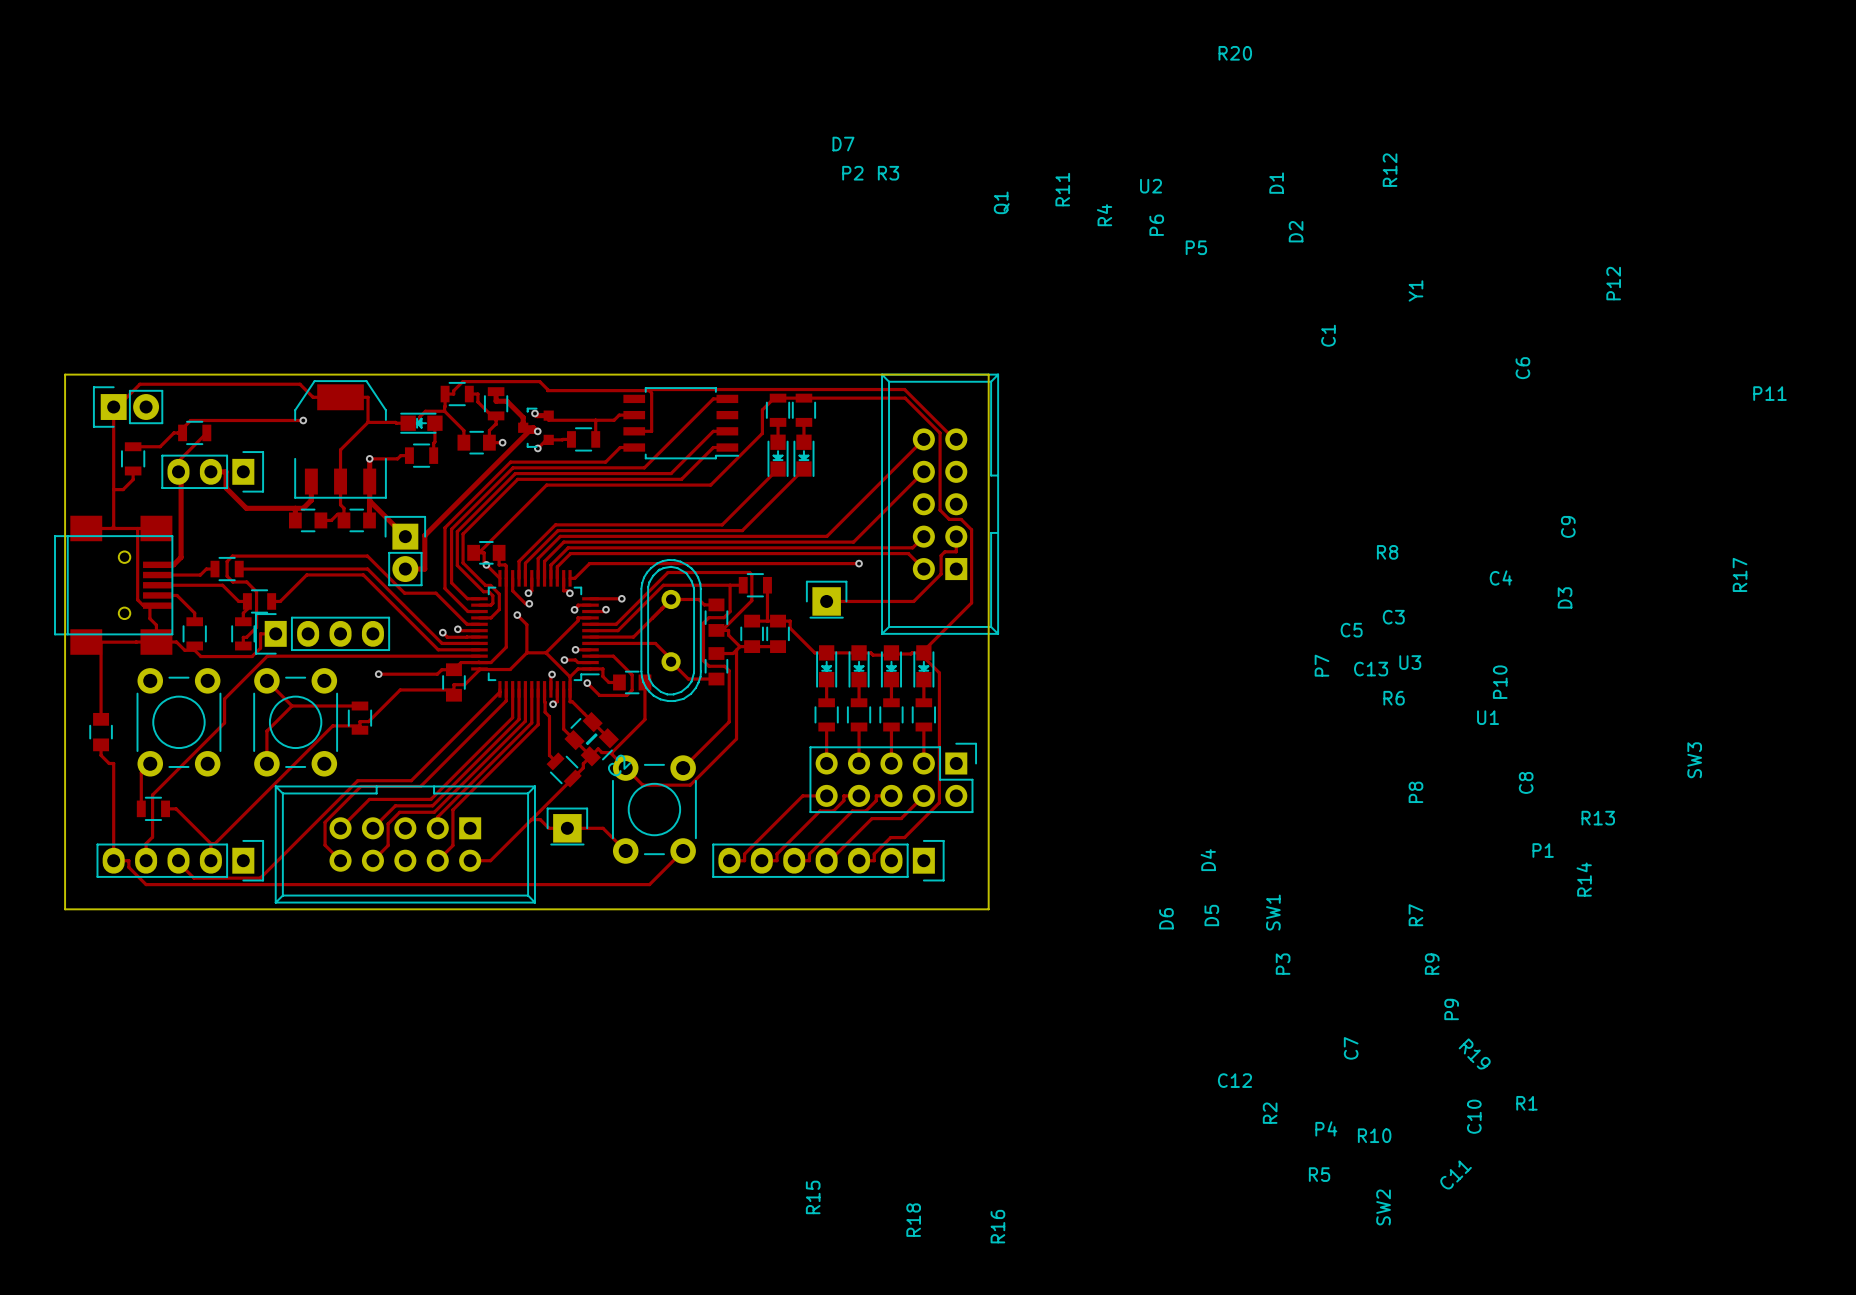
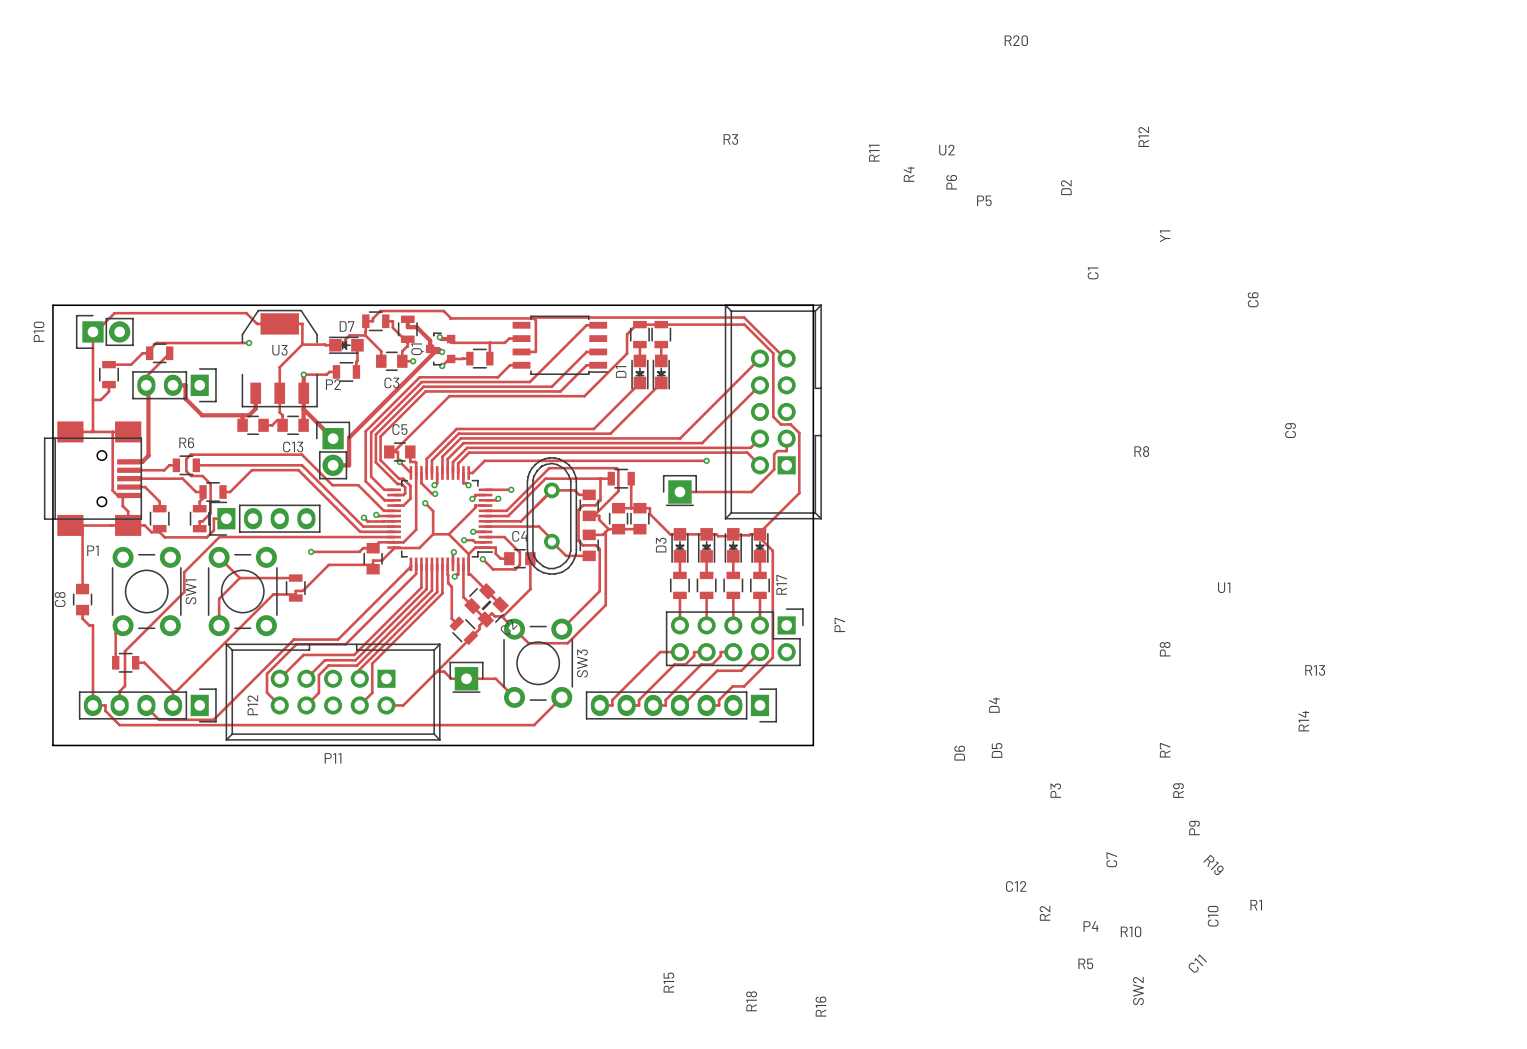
D7 name position: D7 (843, 144) -> D7 (346, 326)
P2 name position: P2 (852, 173) -> P2 (333, 384)
D1 name position: D1 (1276, 183) -> D1 (621, 371)
Q1 name position: Q1 (1001, 202) -> Q1 (417, 349)
P12 name position: P12 (1613, 283) -> P12 (252, 705)
P11 name position: P11 (1769, 393) -> P11 (333, 758)
R17 name position: R17 (1740, 574) -> R17 (781, 584)
C4 name position: C4 (1501, 577) -> C4 (519, 536)
D3 name position: D3 (1565, 597) -> D3 (661, 545)
C3 name position: C3 (1393, 617) -> C3 (391, 382)
C5 name position: C5 (1351, 630) -> C5 (399, 429)
U3 name position: U3 (1410, 662) -> U3 (279, 350)
P7 name position: P7 (1321, 665) -> P7 (839, 624)
C13 name position: C13 (1371, 669) -> C13 (293, 446)
P10 name position: P10 (1500, 682) -> P10 (39, 331)
R6 name position: R6 (1394, 698) -> R6 (186, 442)
SW3 name position: SW3 (1694, 760) -> SW3 (582, 663)
C8 name position: C8 (1526, 782) -> C8 (60, 599)
P1 name position: P1 (1543, 850) -> P1 (92, 550)
SW1 name position: SW1 (1273, 912) -> SW1 (190, 591)

